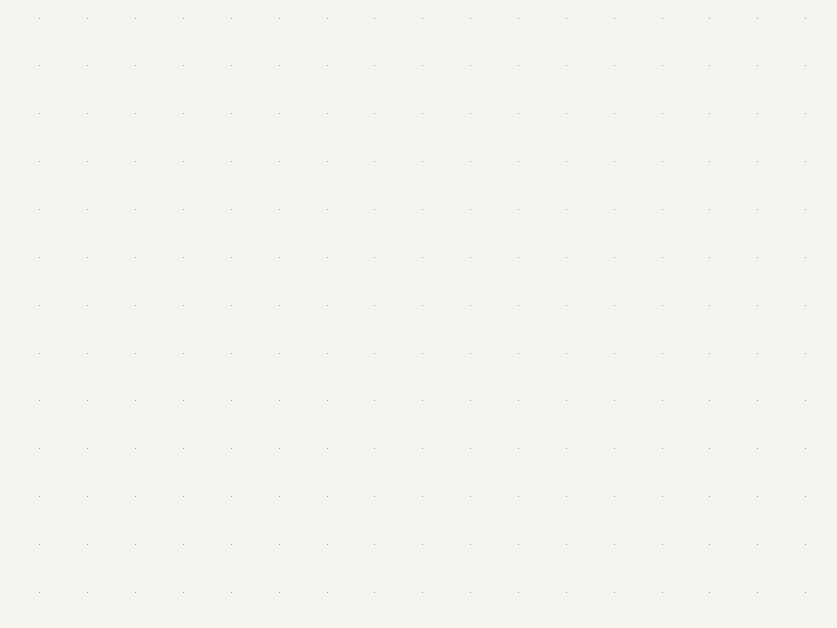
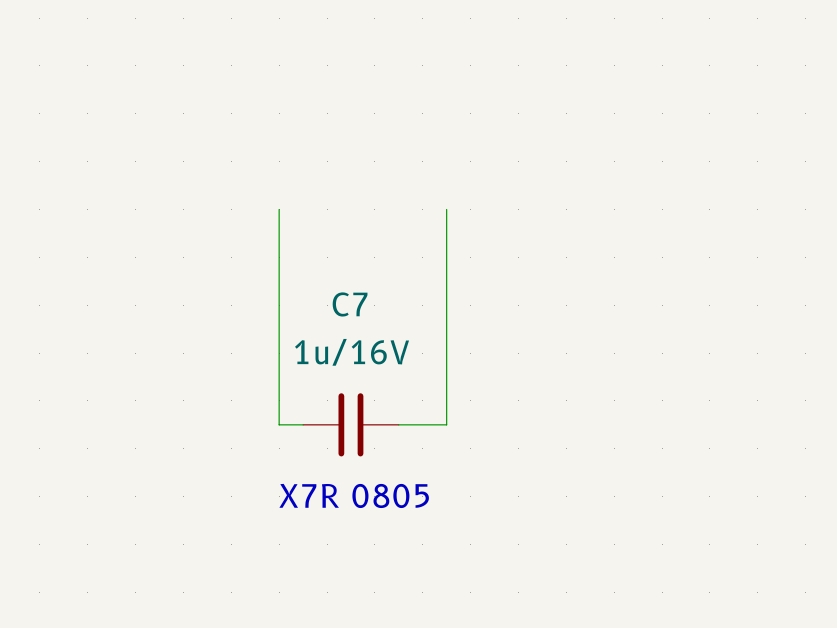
wire: none -> (279, 209) (279, 424) (303, 424)
wire: none -> (446, 209) (446, 424) (398, 424)
C7: none -> 1u/16V (350, 424)
text: none -> X7R 0805 (354, 495)

